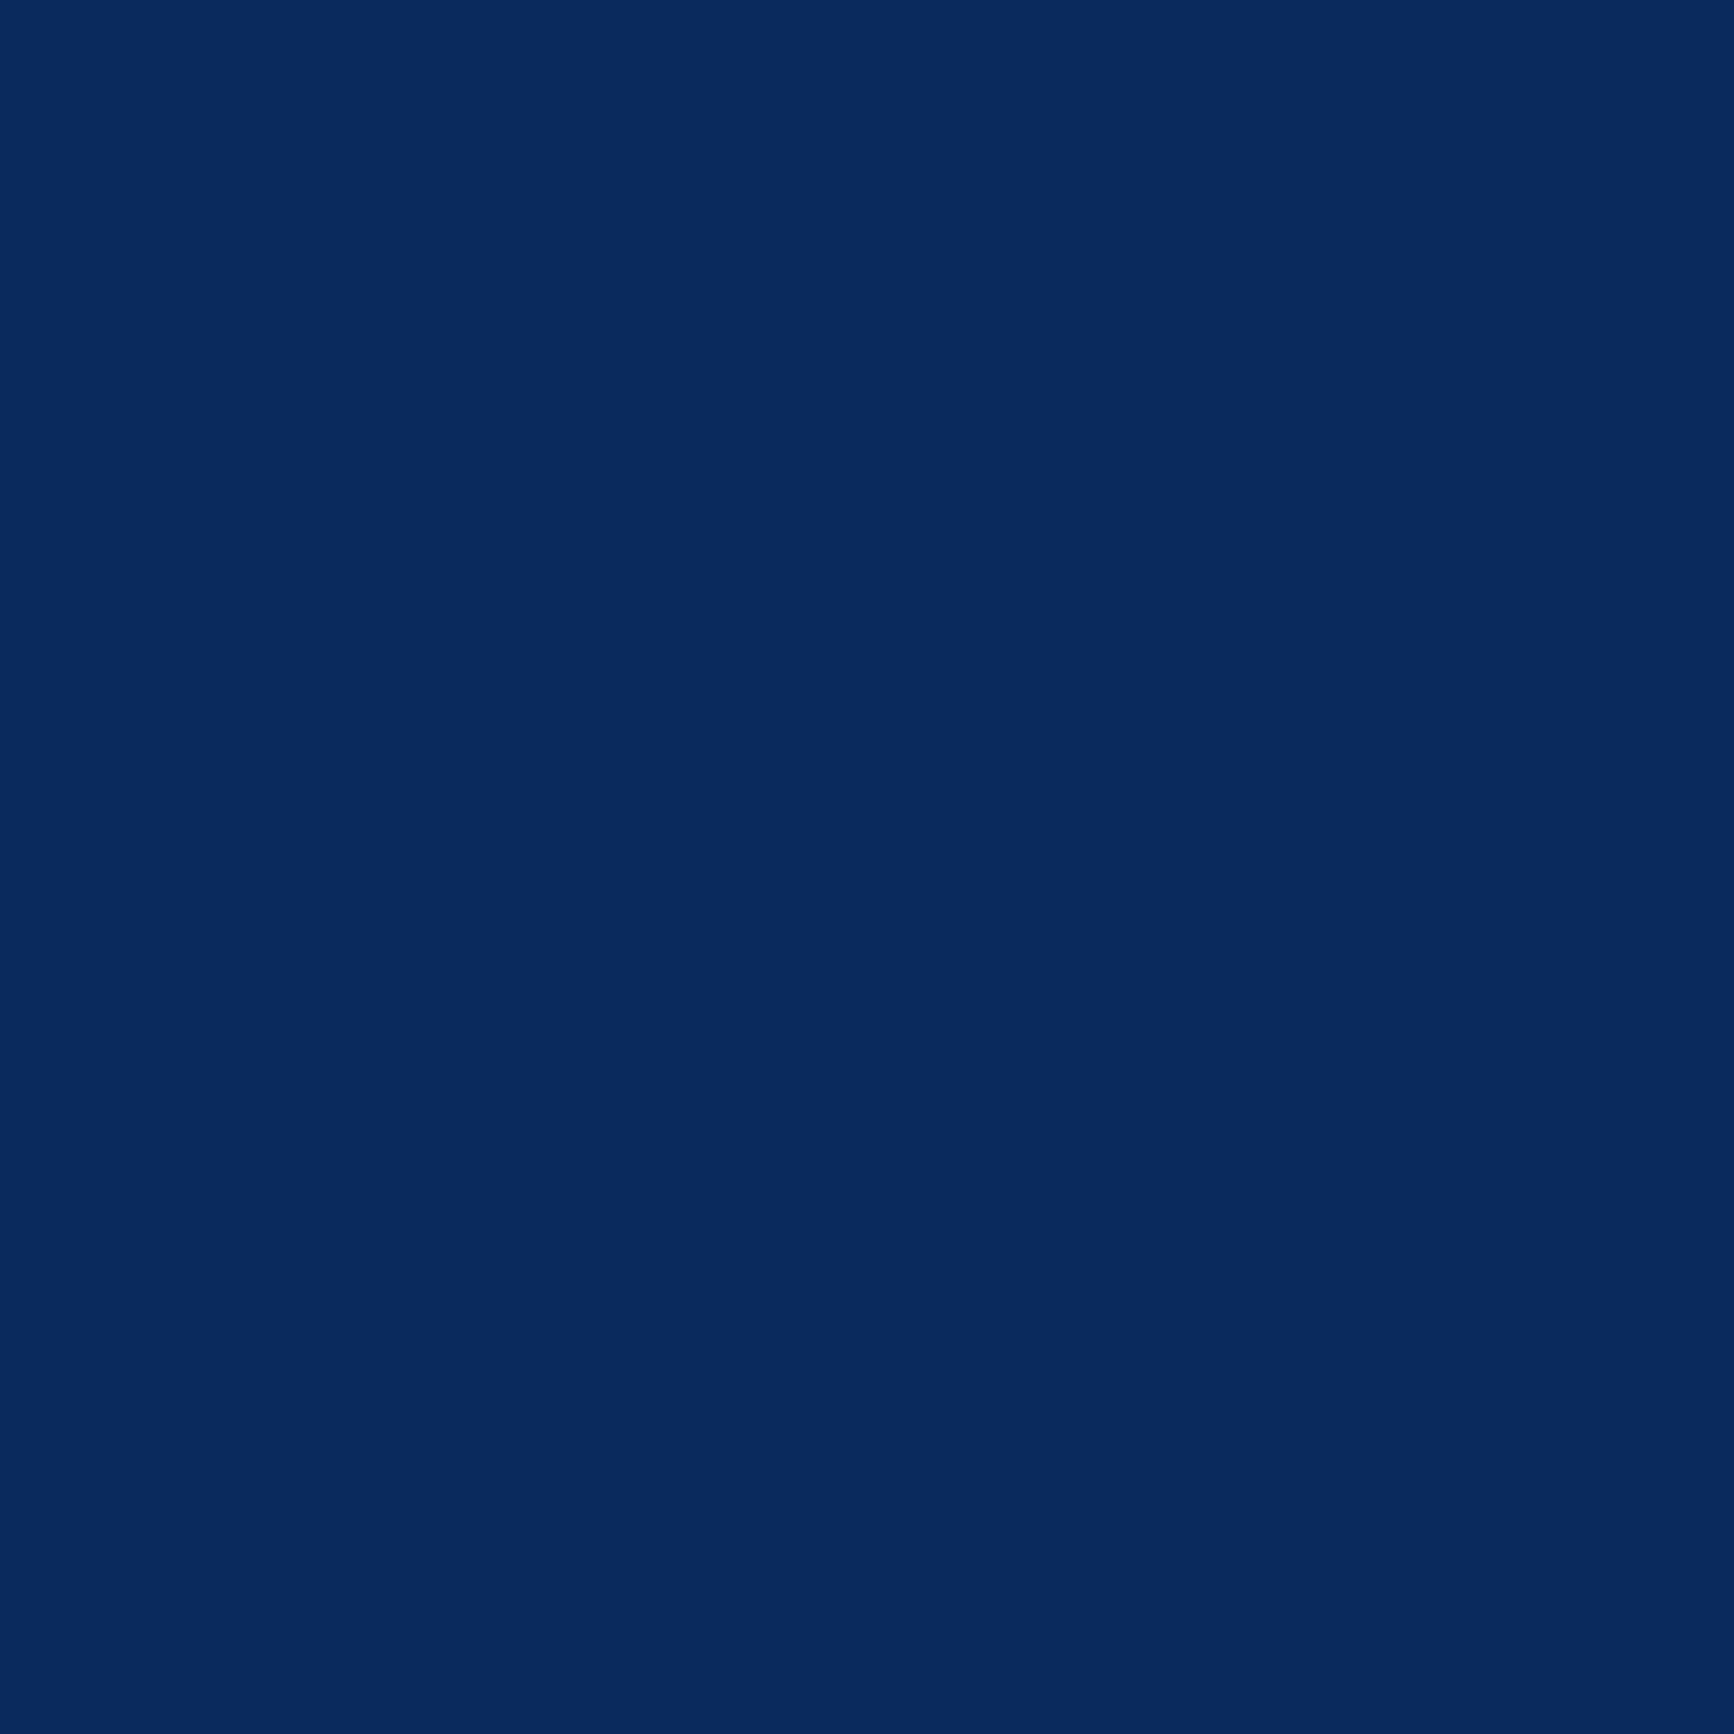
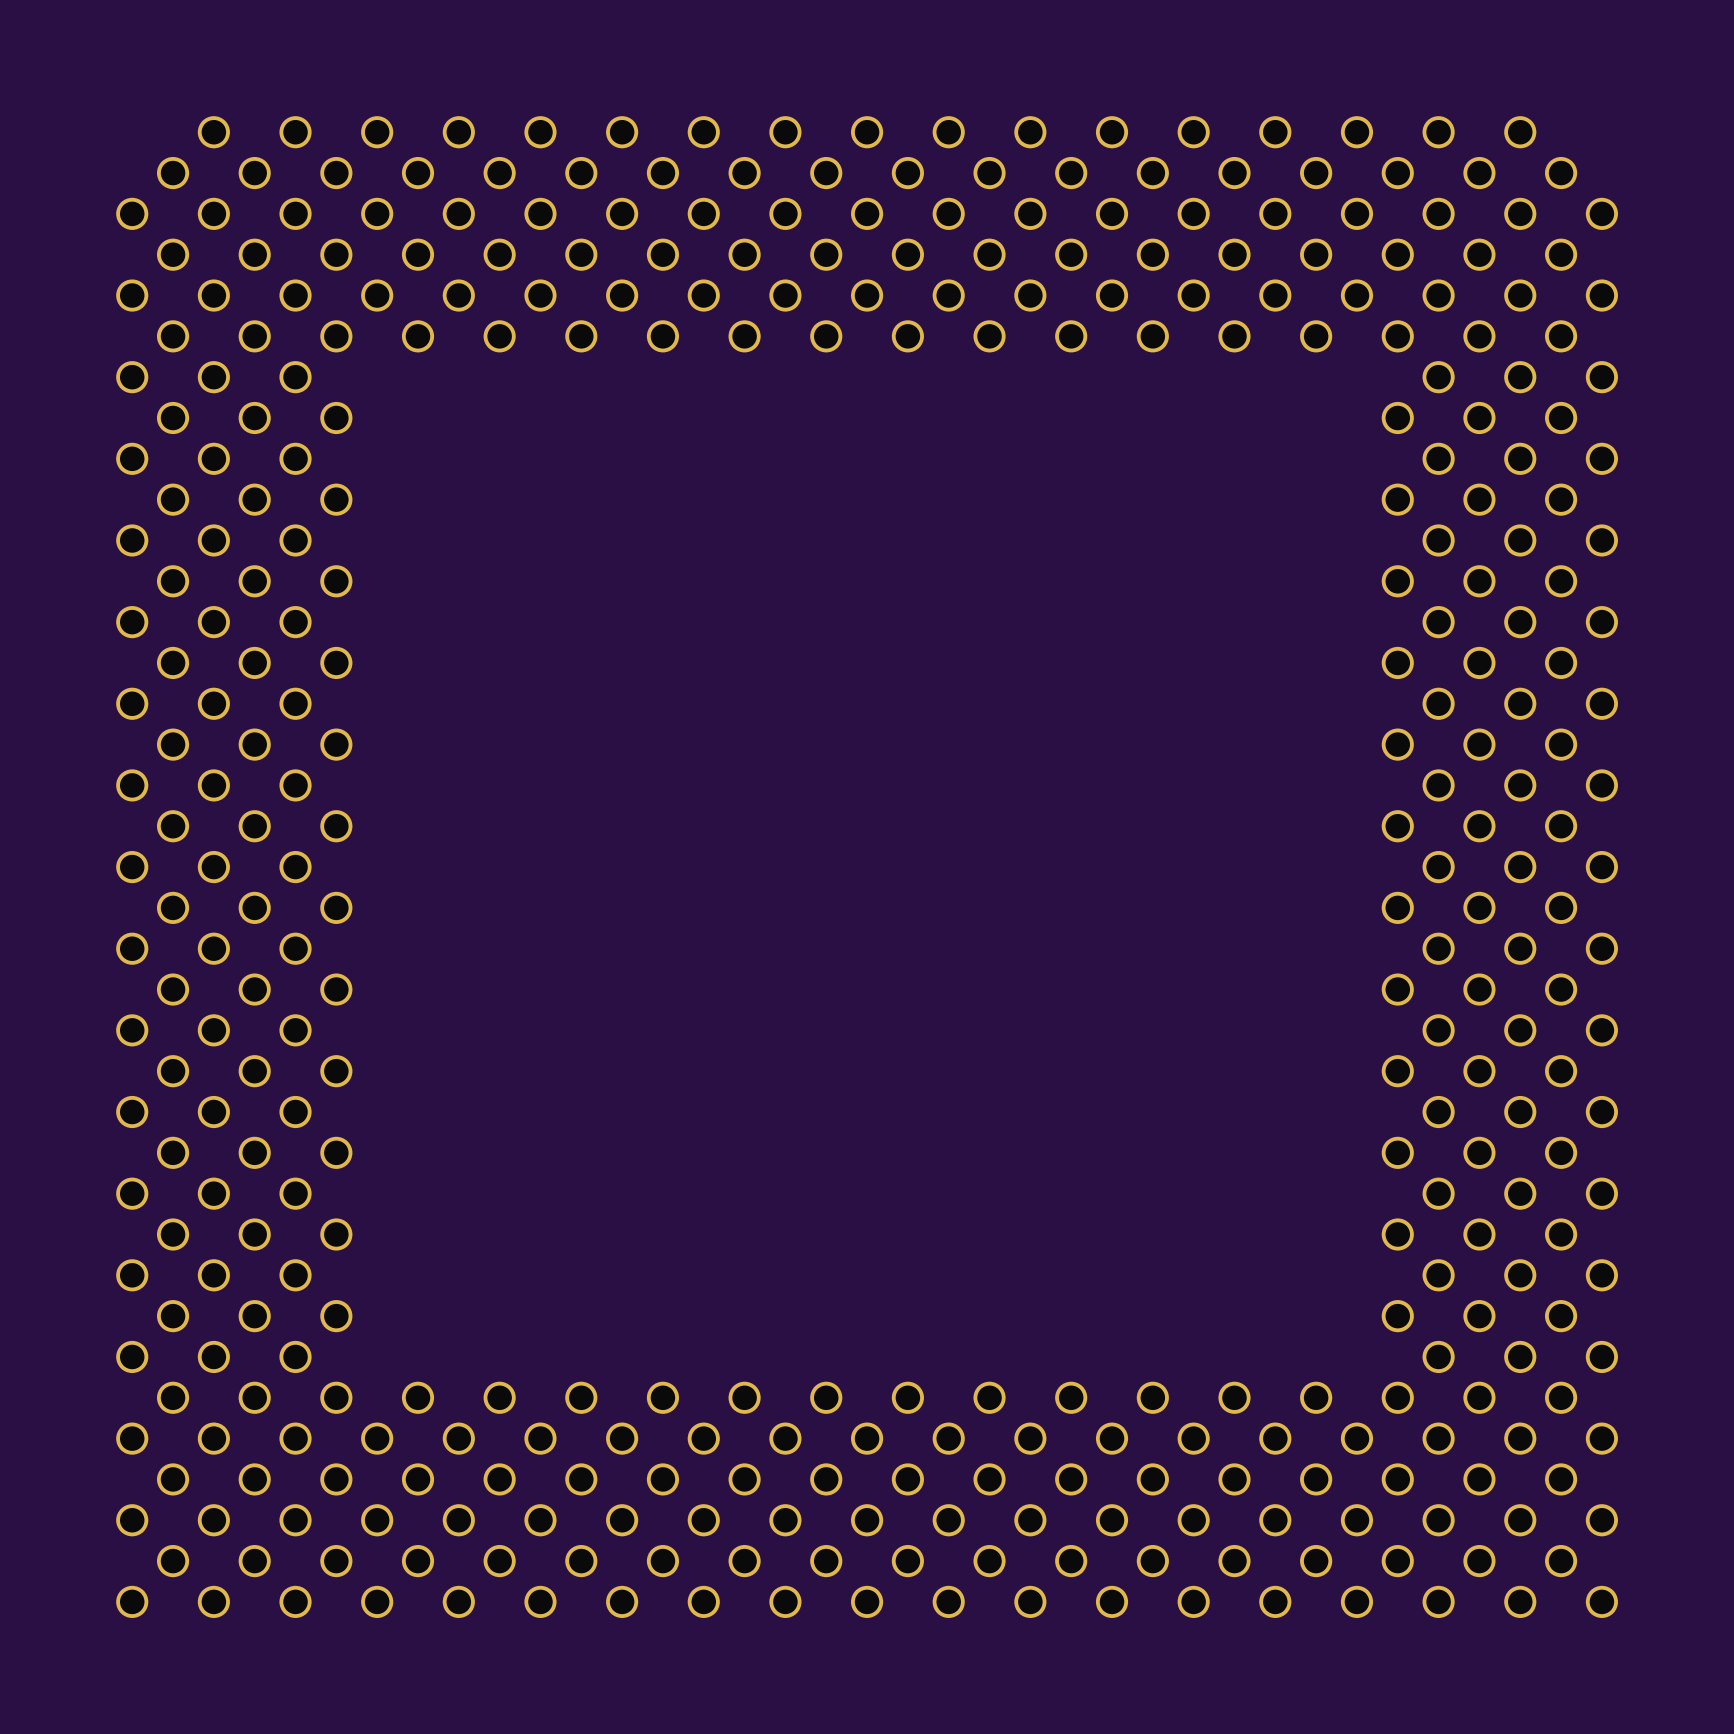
part: none -> (867, 867)

